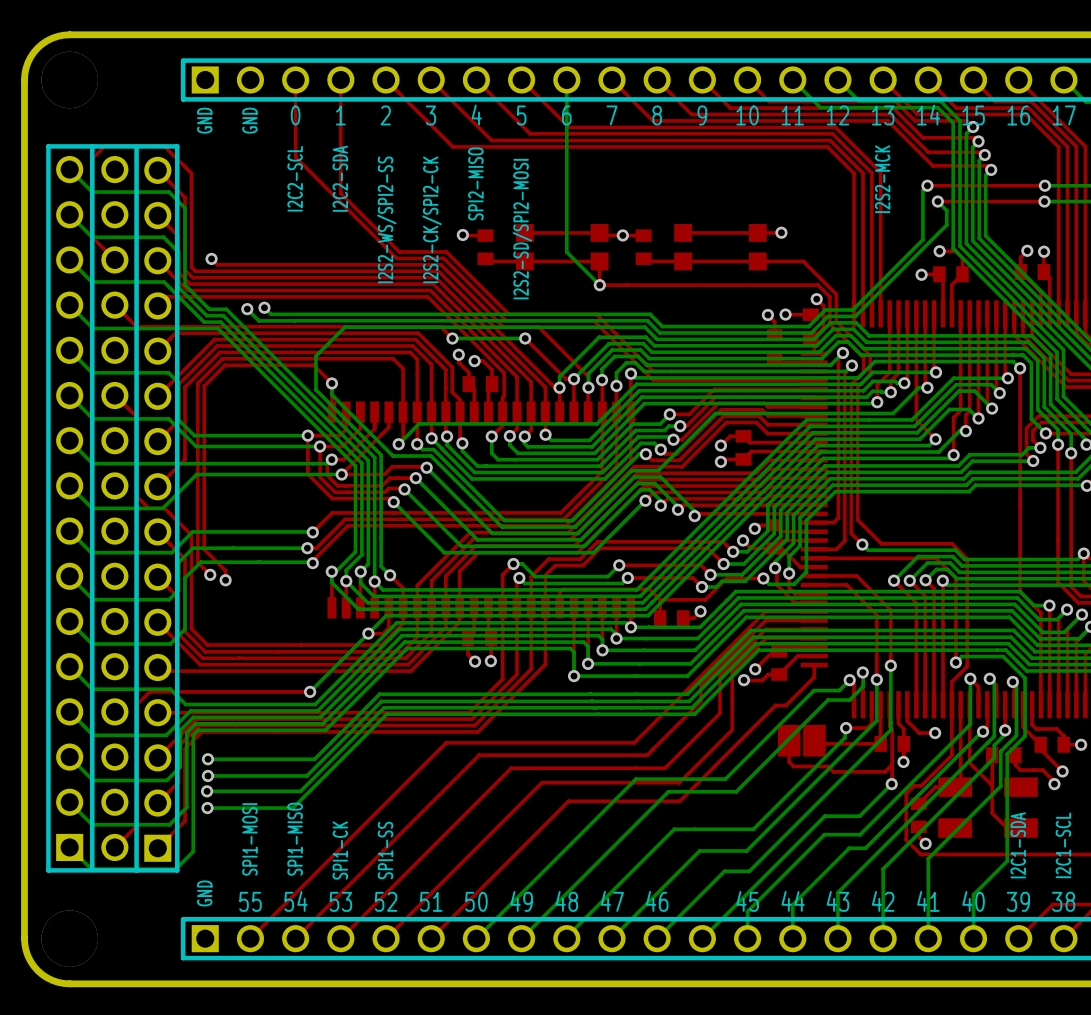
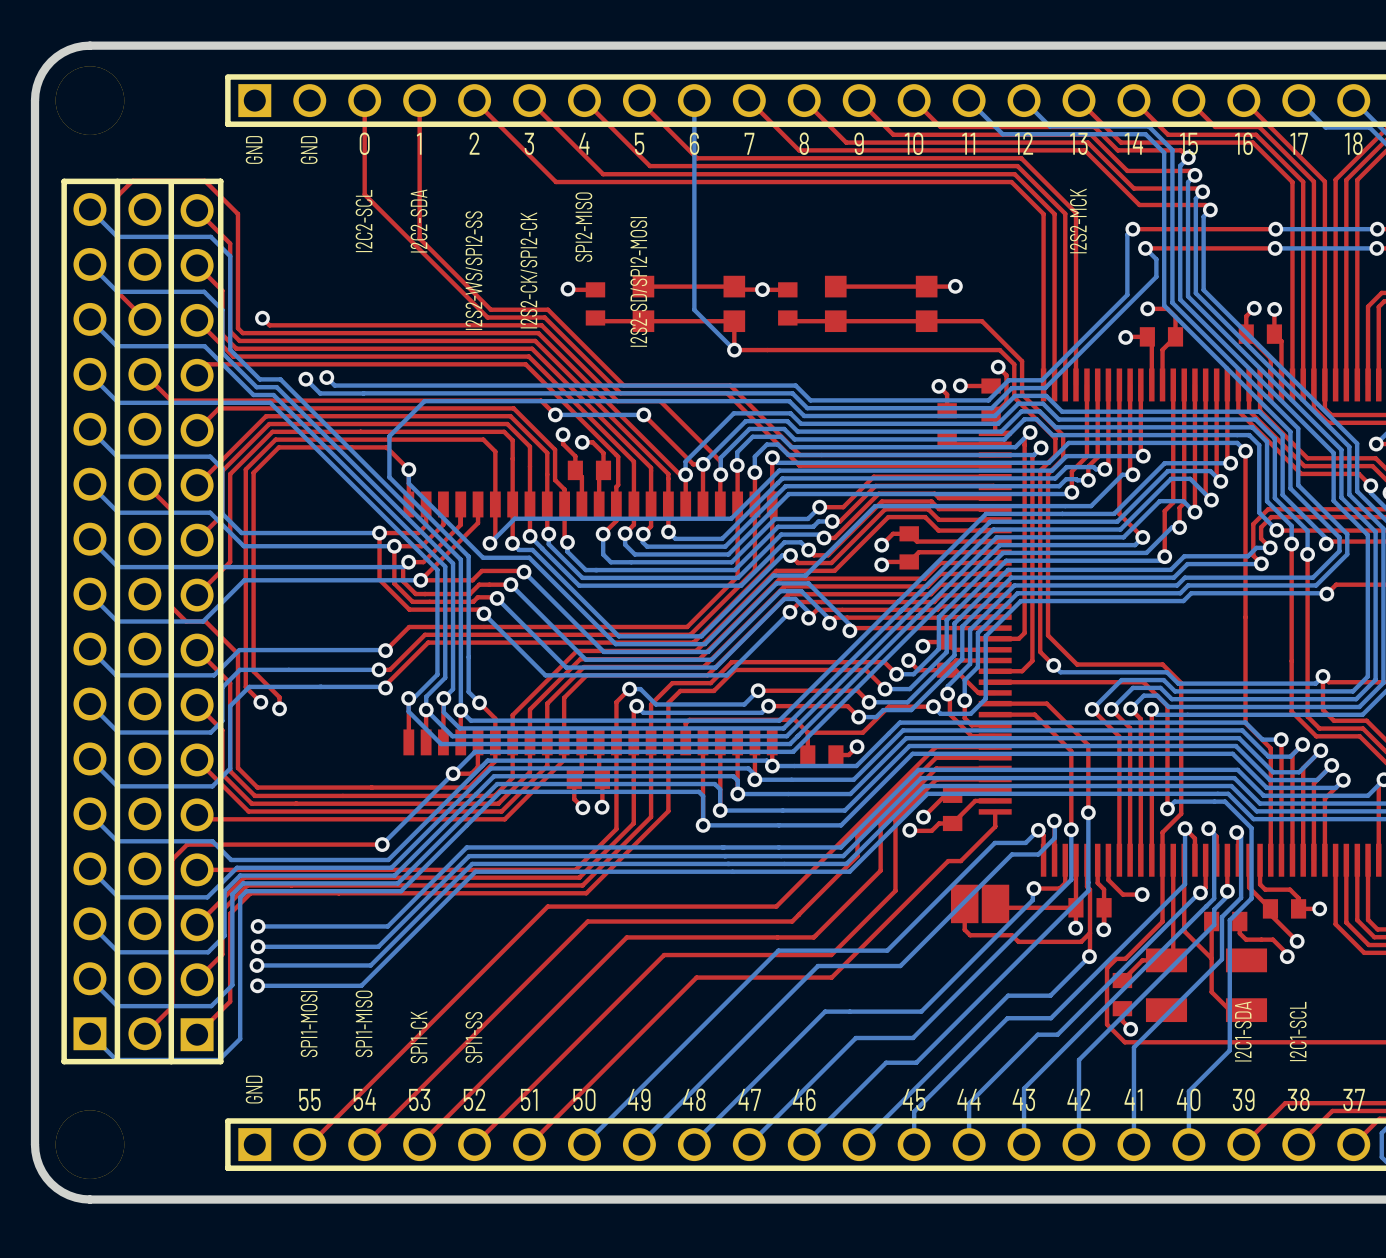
via: none -> (1075, 928)

